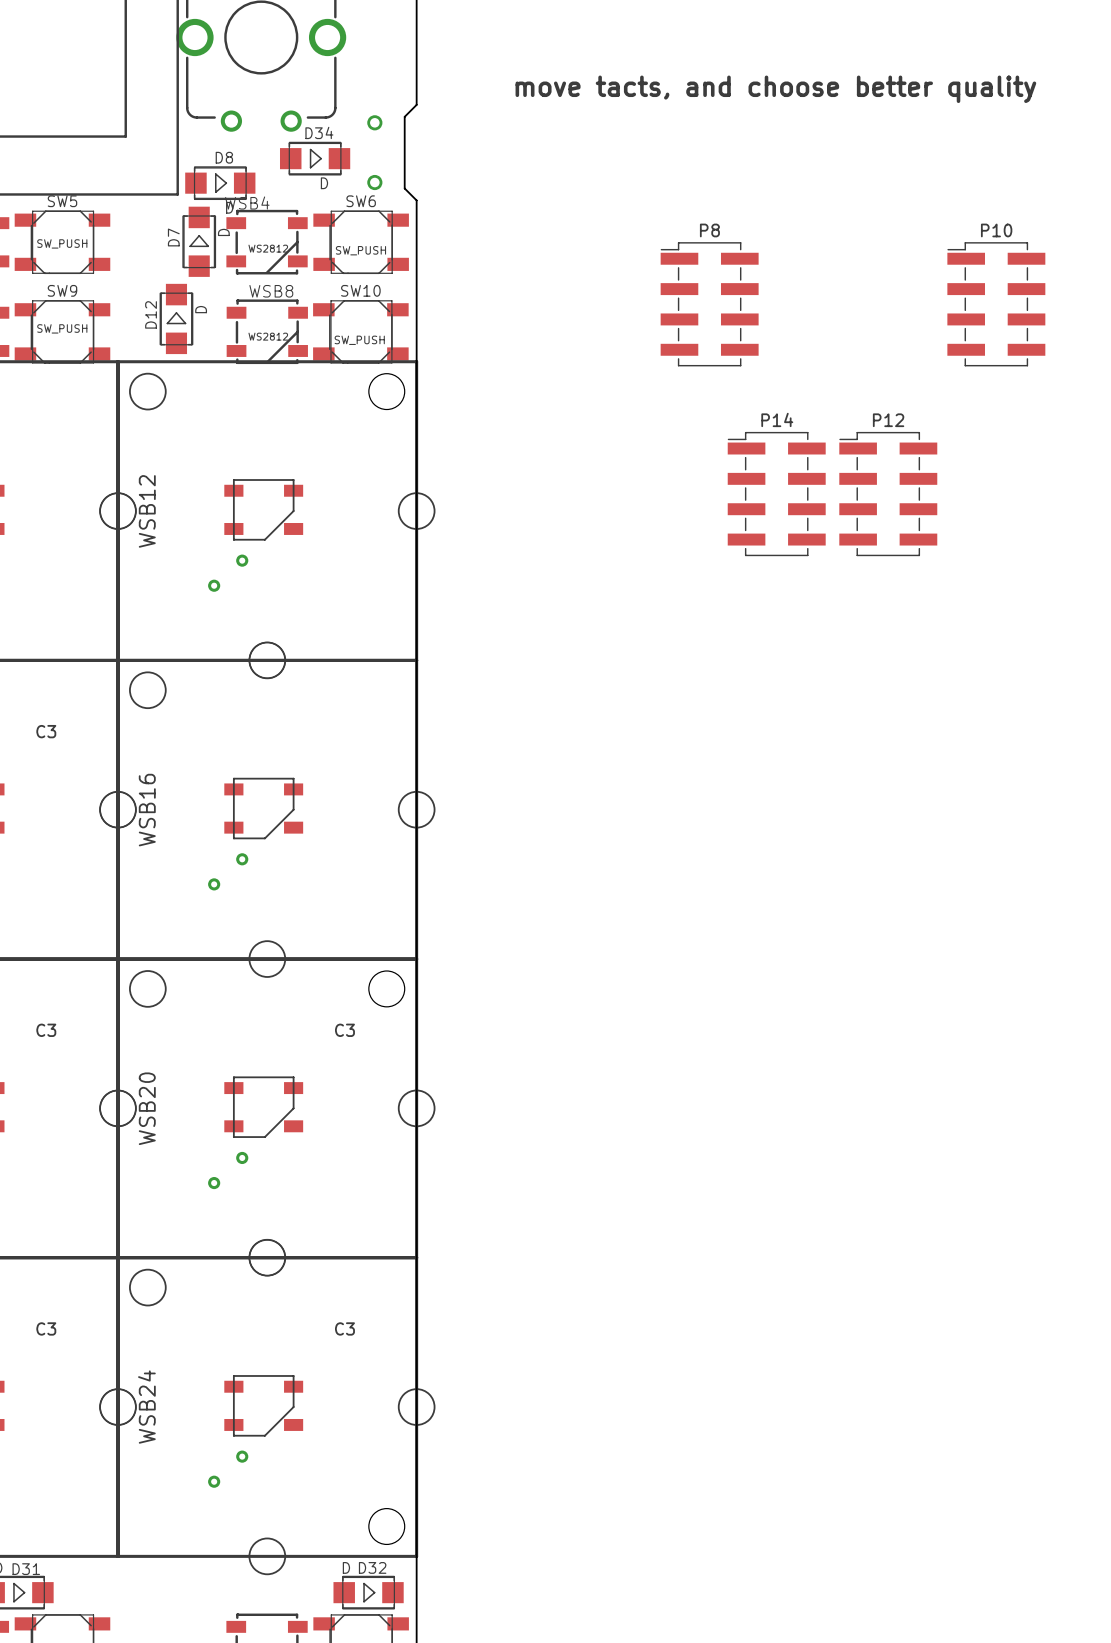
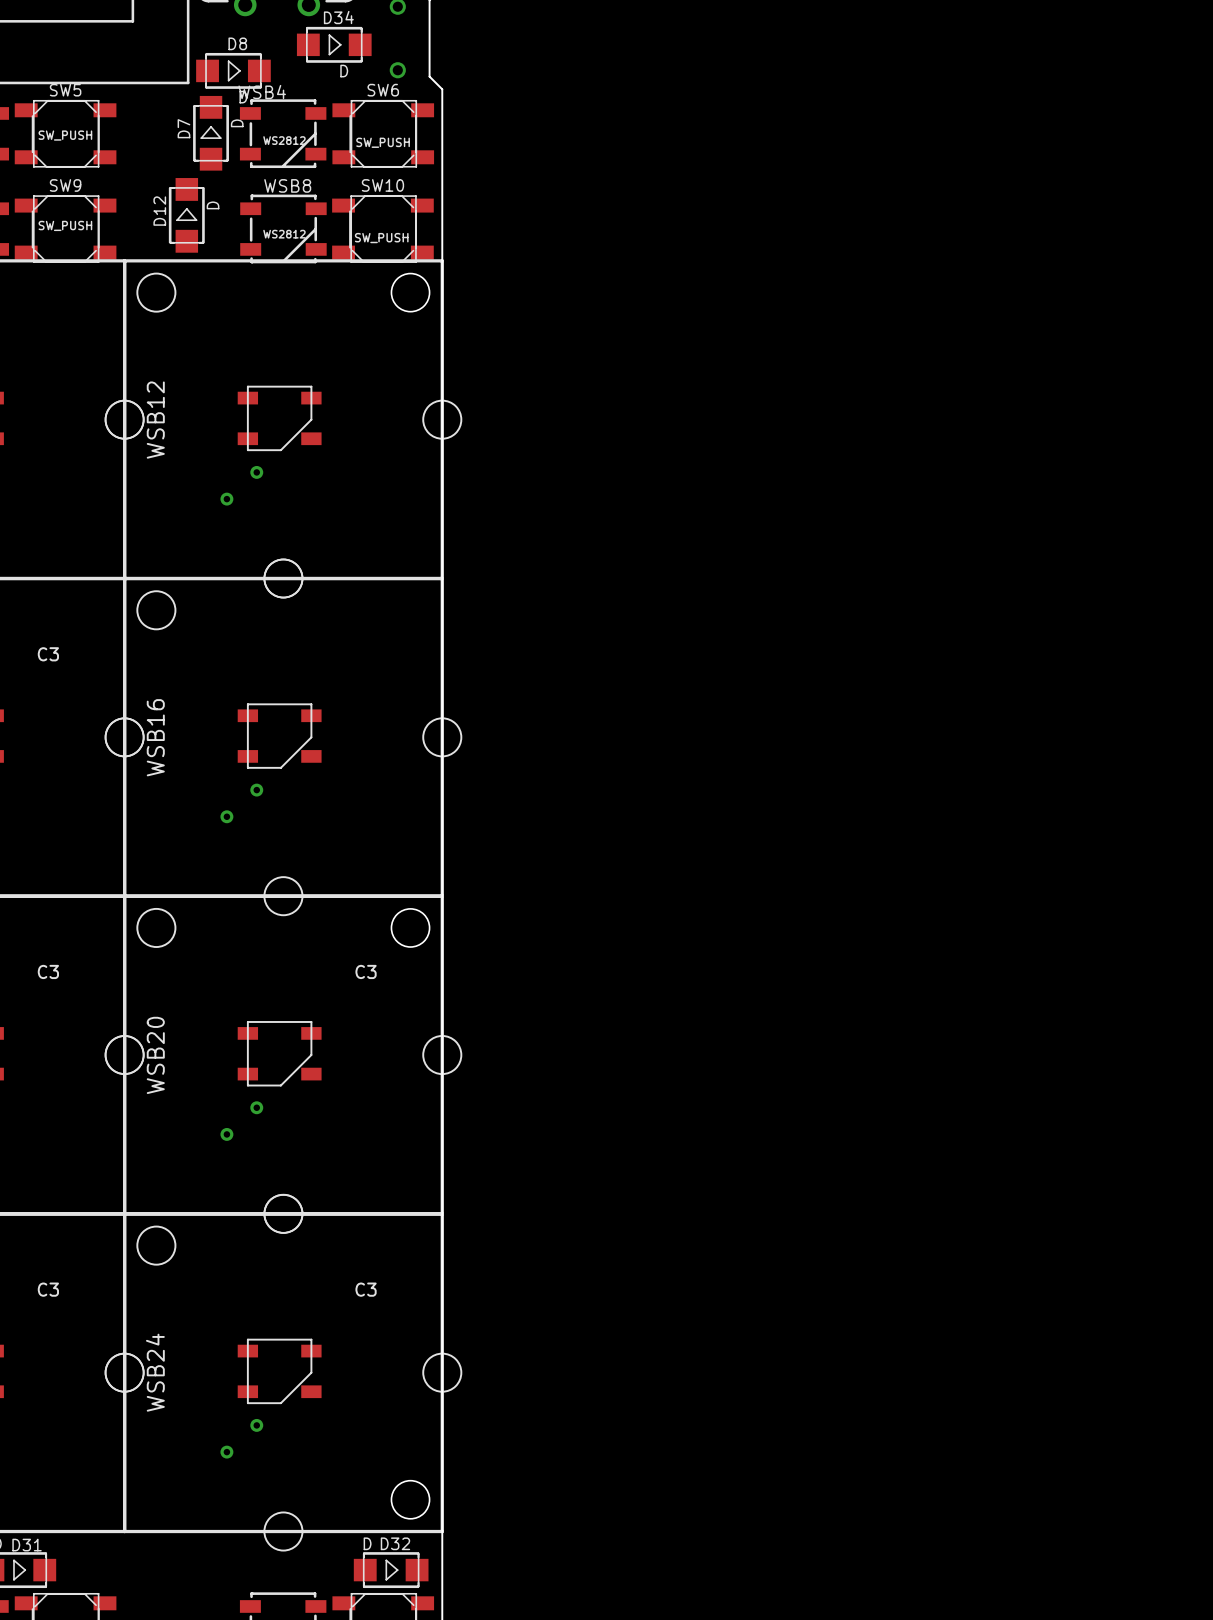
P8: (709, 304) -> none
P10: (996, 304) -> none
P14: (776, 494) -> none
P12: (888, 494) -> none

